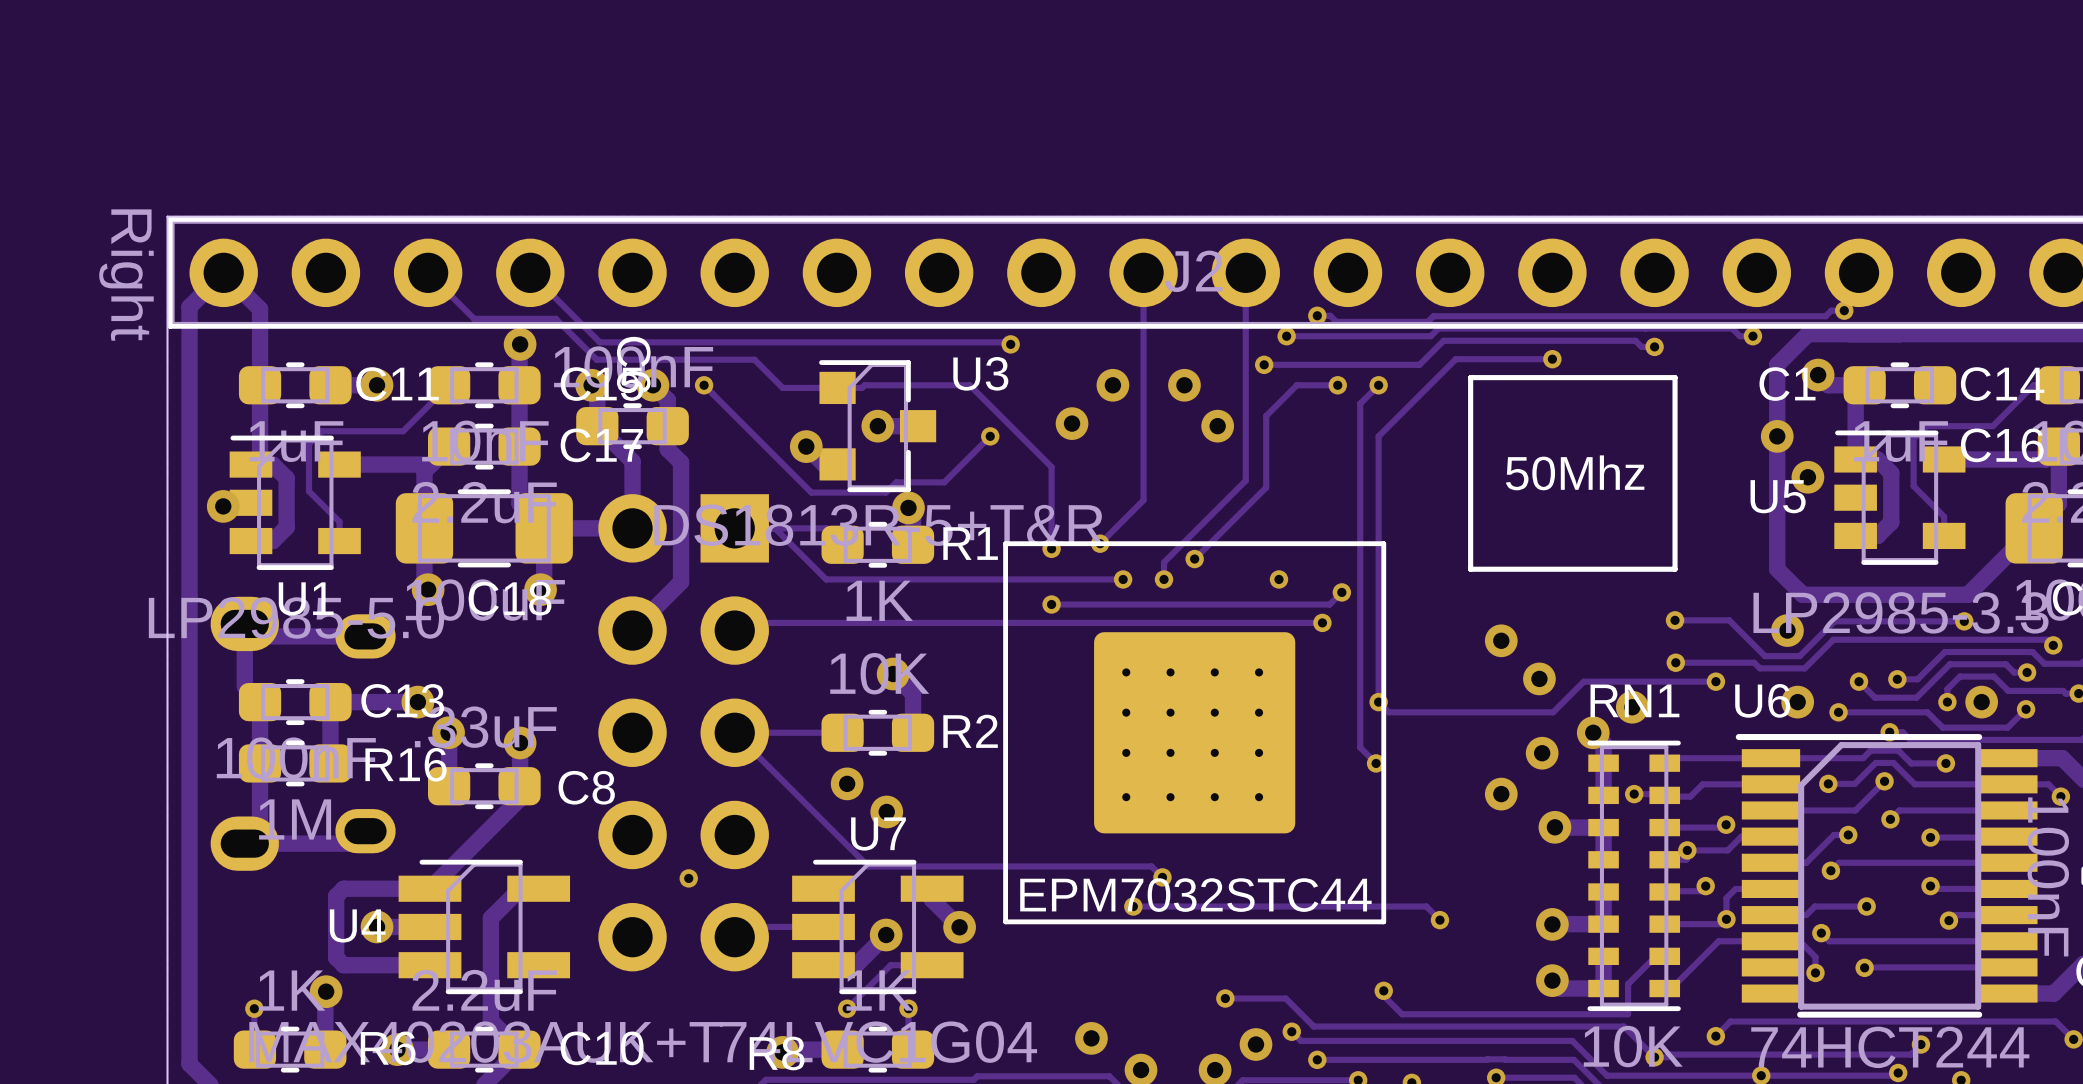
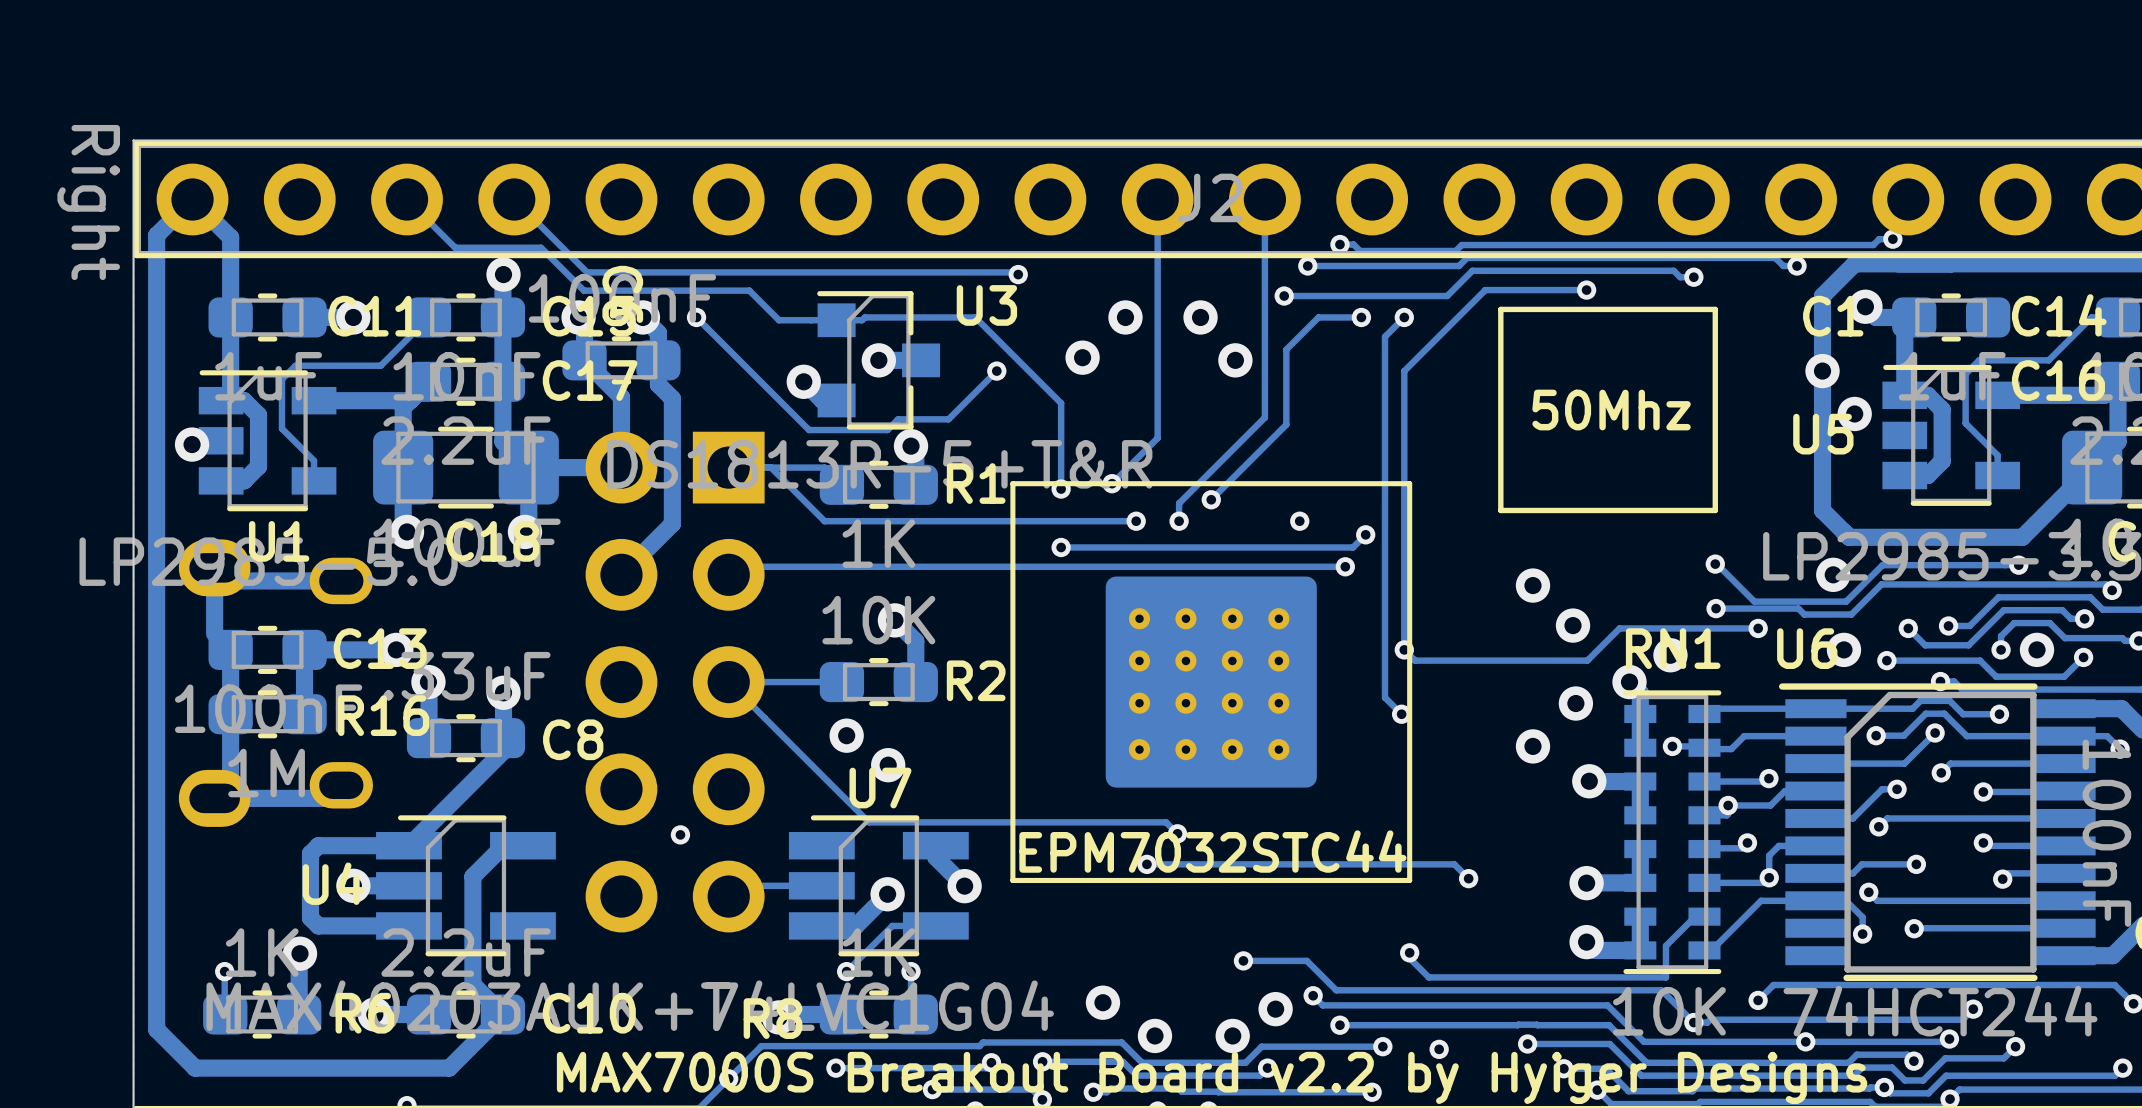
track: (1676, 620) (1729, 620) (1764, 656) -> (1716, 564) (1754, 601) (1809, 601)

